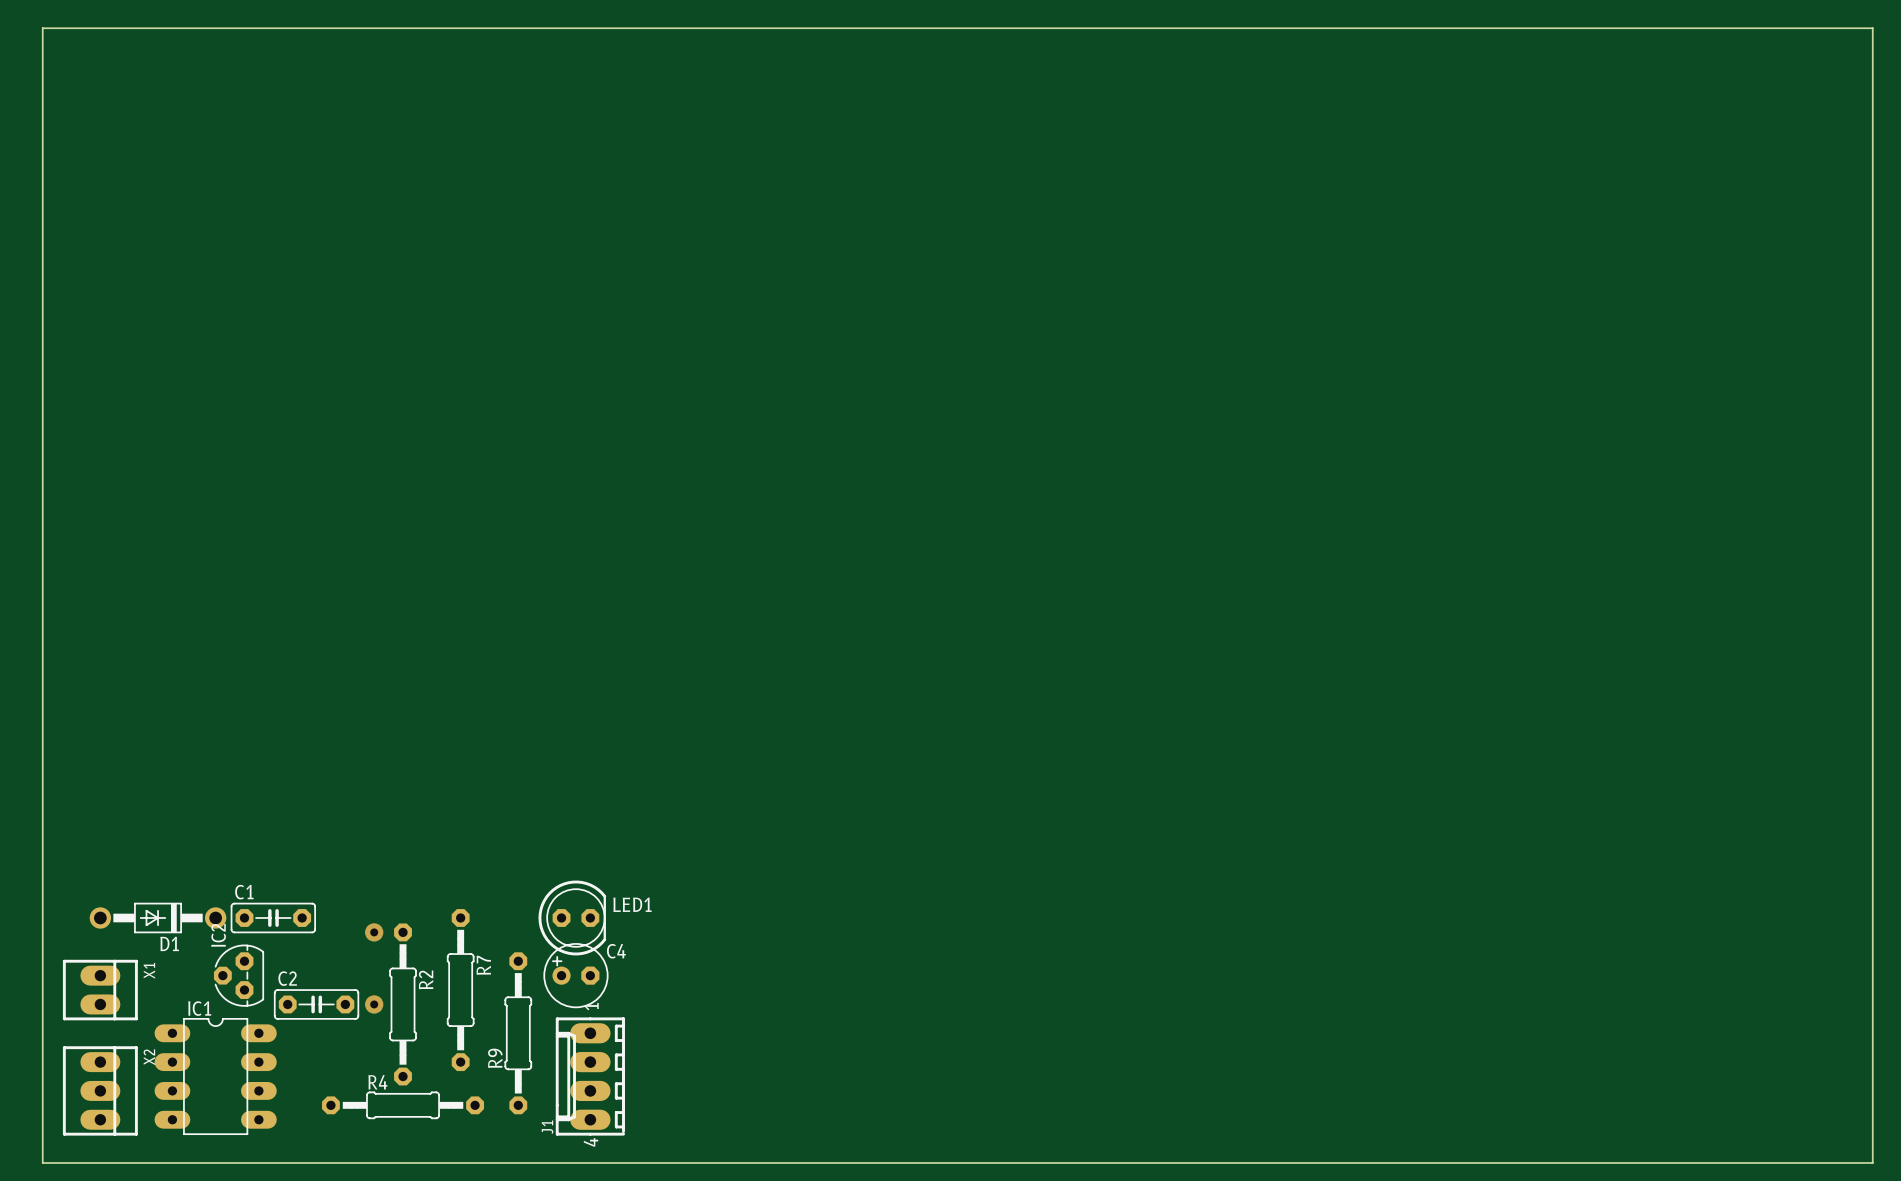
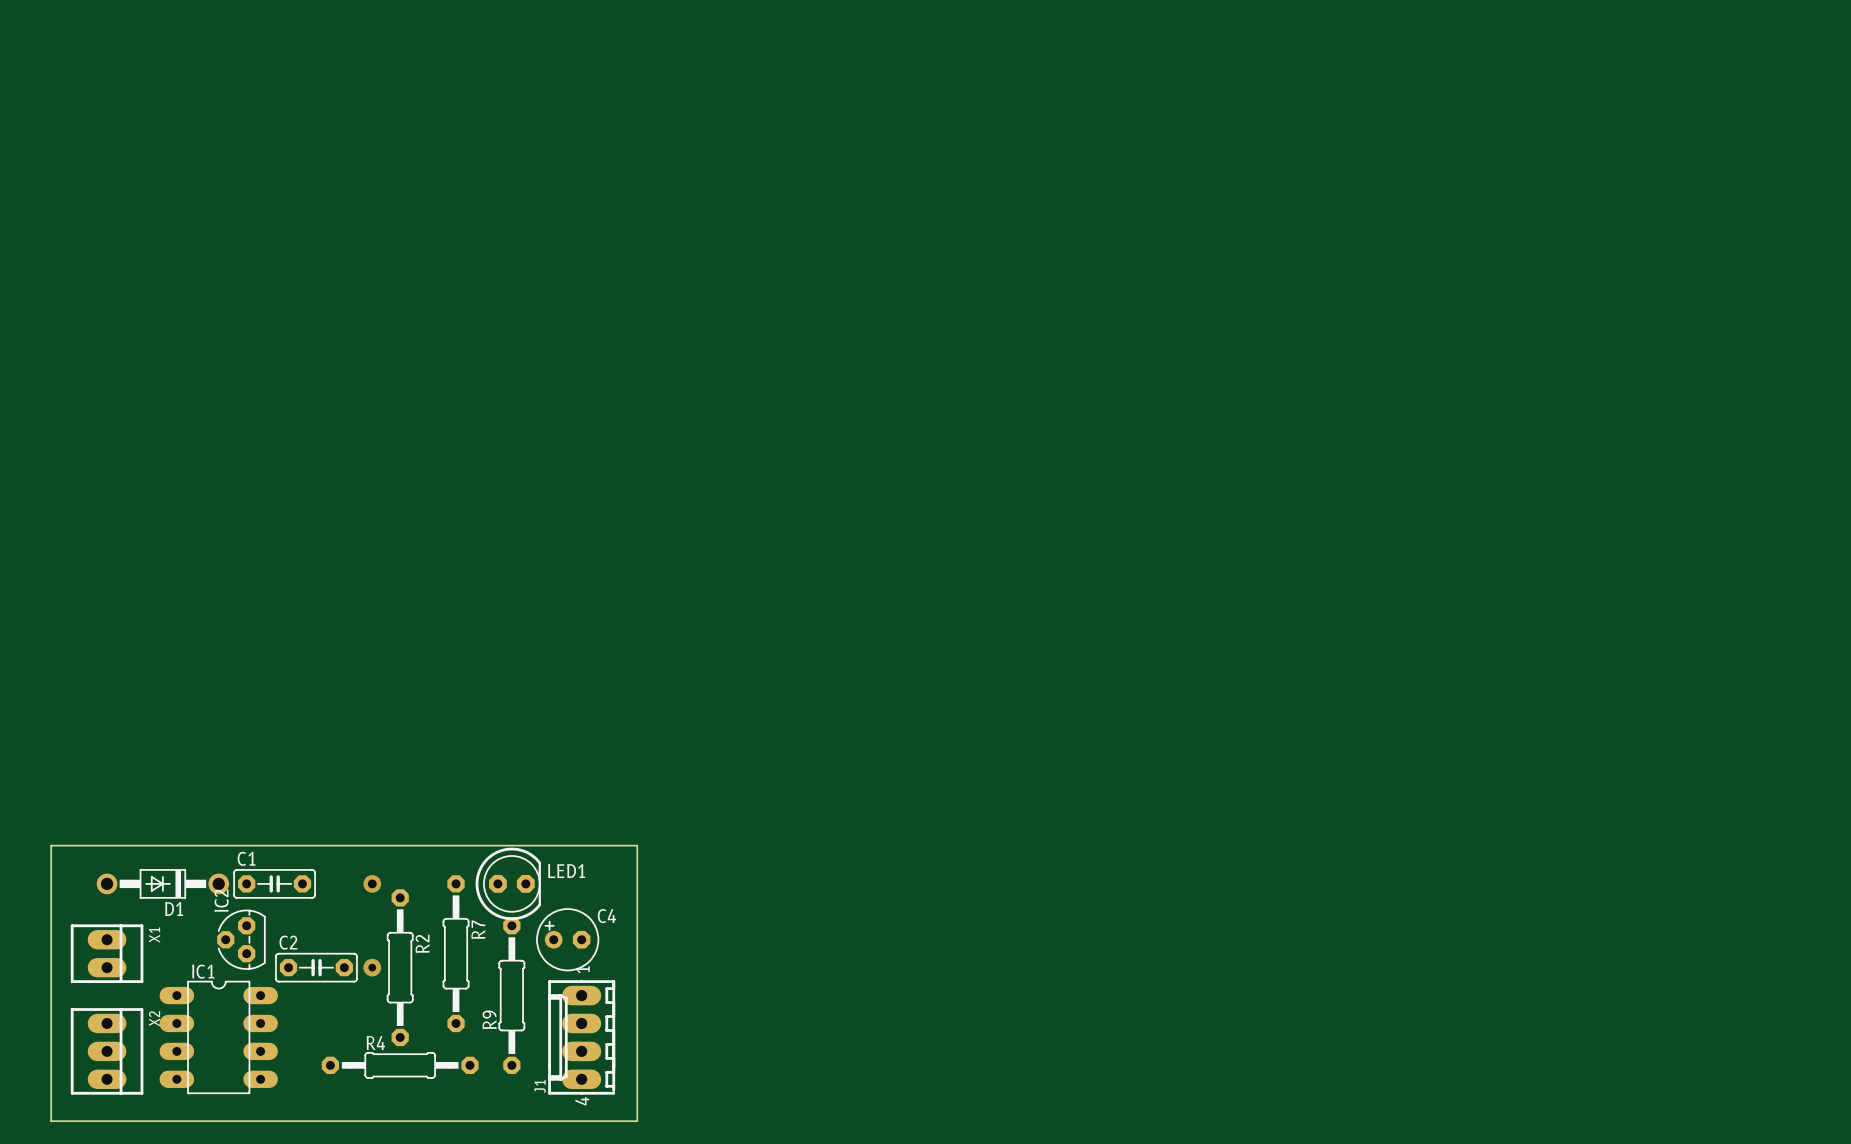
board edge: (42, 878) (42, 28) (1872, 28) (1872, 1162) (647, 1162) -> (51, 845) (637, 845) (637, 1121)
LED1 footprint: [538, 880, 607, 956] -> [475, 847, 542, 921]
via: none -> (372, 883)
via: (374, 932) -> none

